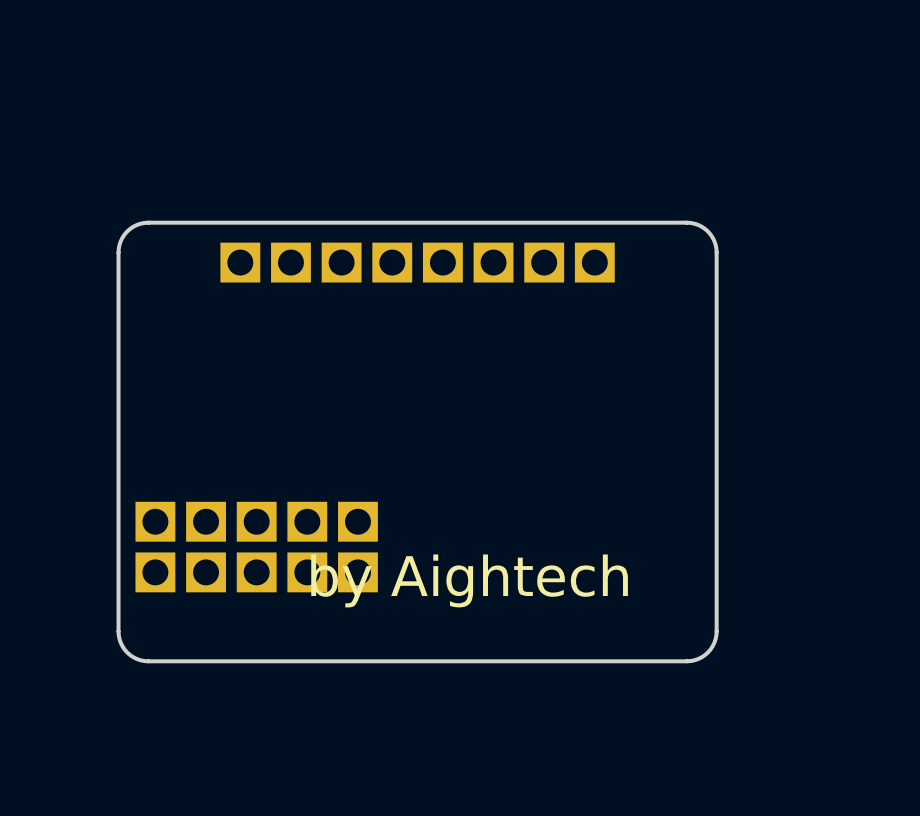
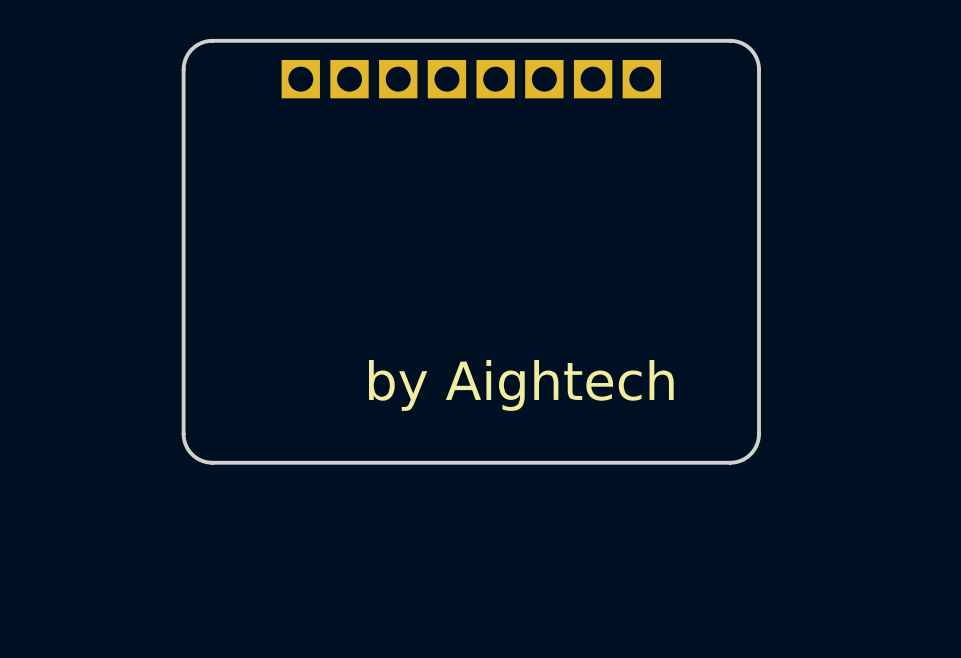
part: (155, 521) -> none
part: (206, 521) -> none
part: (256, 521) -> none
part: (307, 521) -> none
part: (357, 521) -> none
part: (155, 572) -> none
part: (206, 572) -> none
part: (256, 572) -> none
part: (307, 572) -> none
part: (357, 572) -> none

